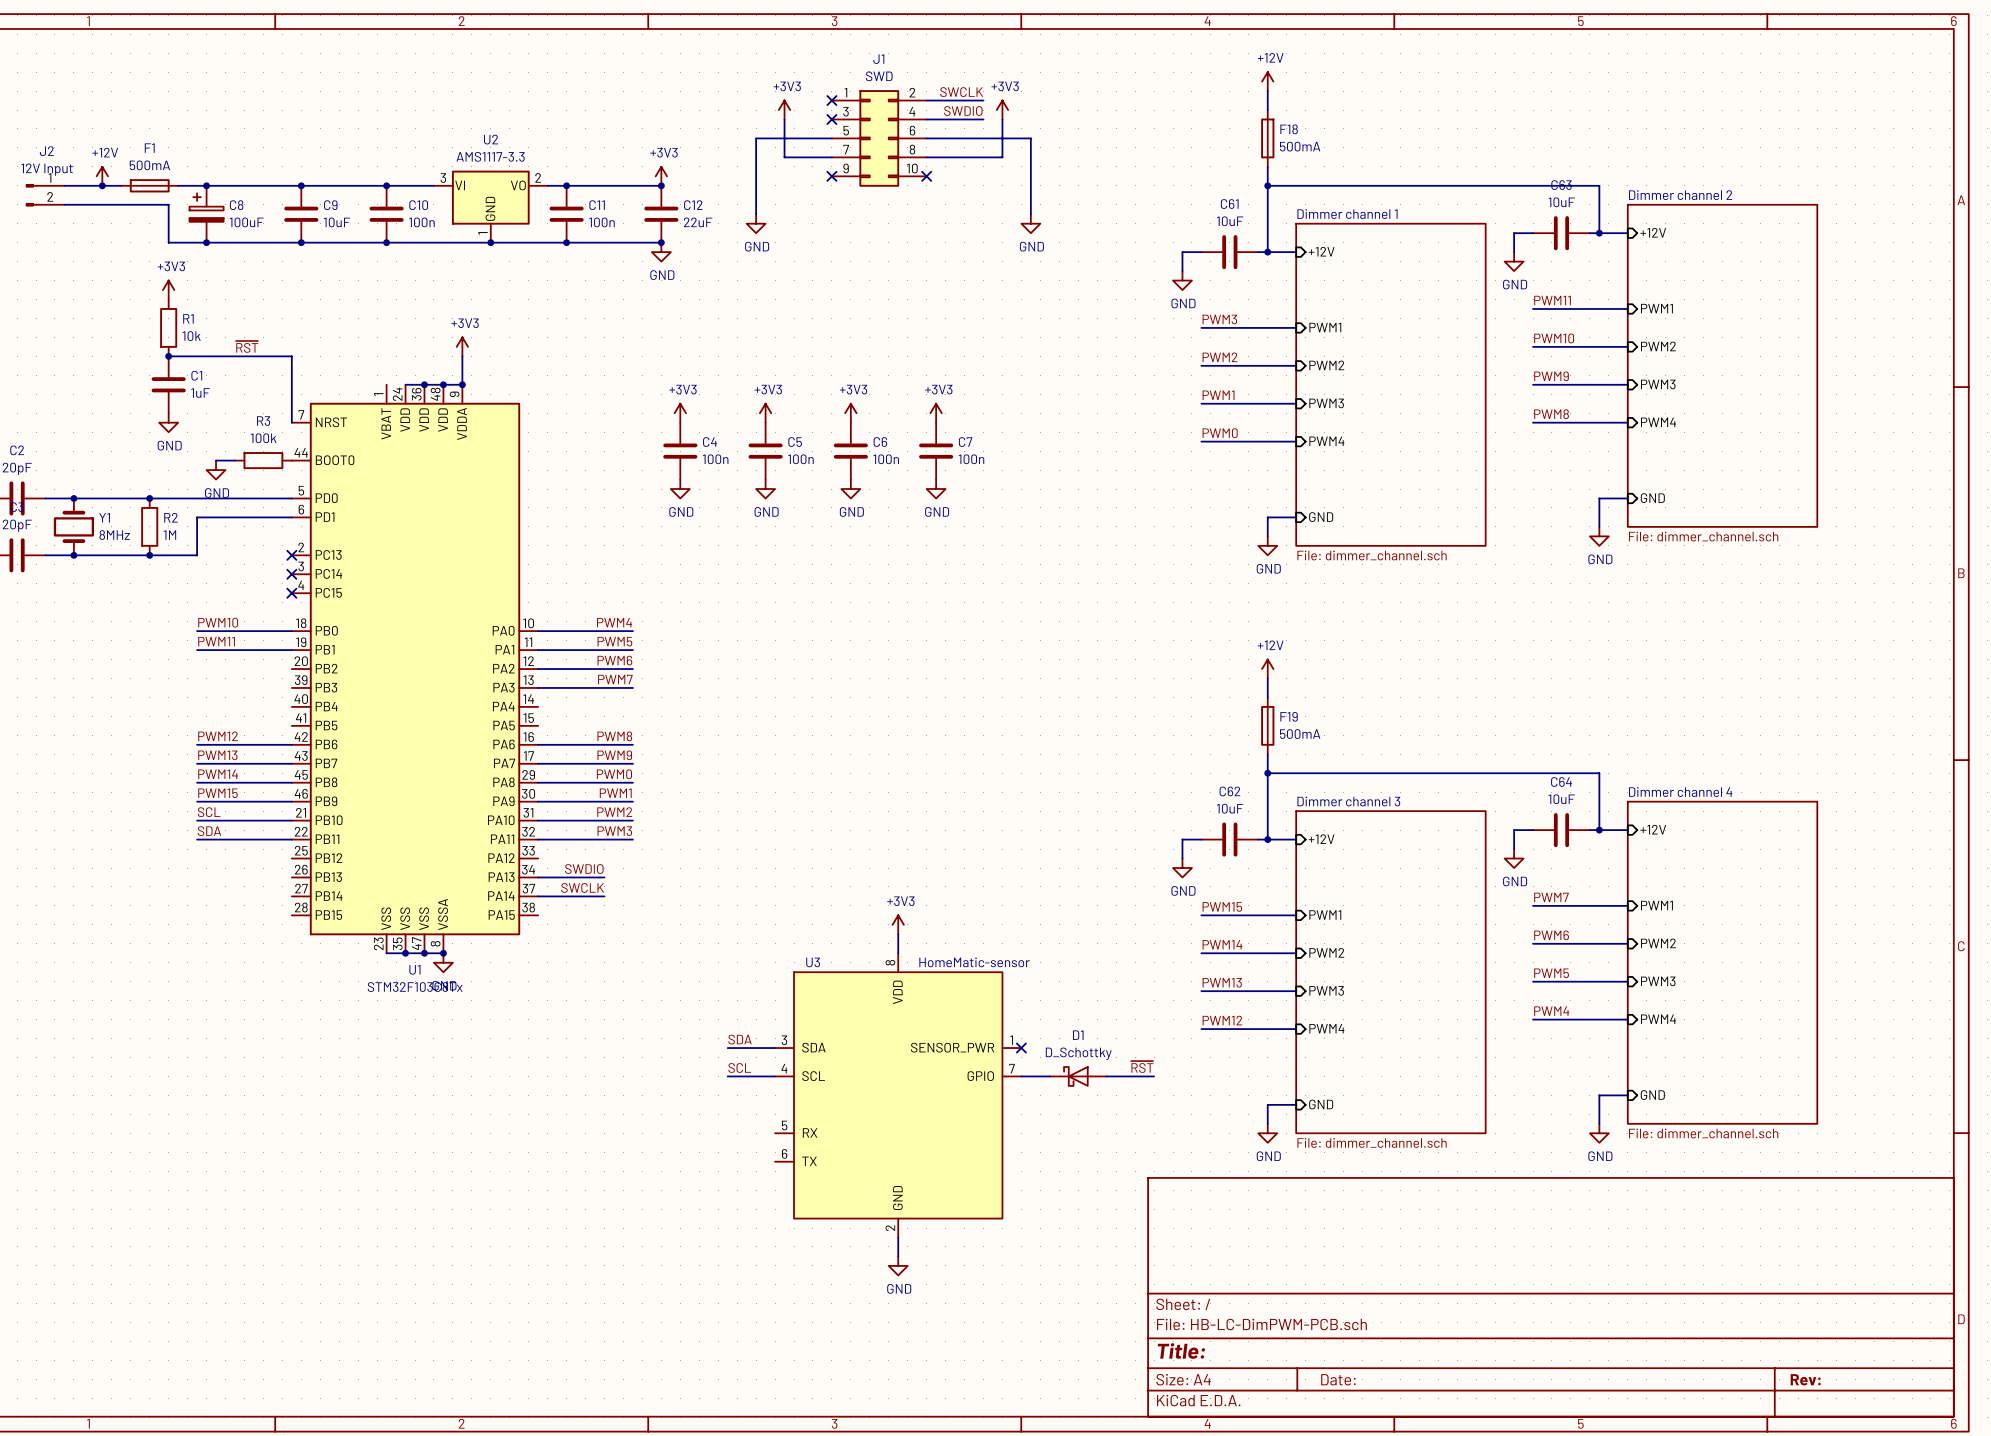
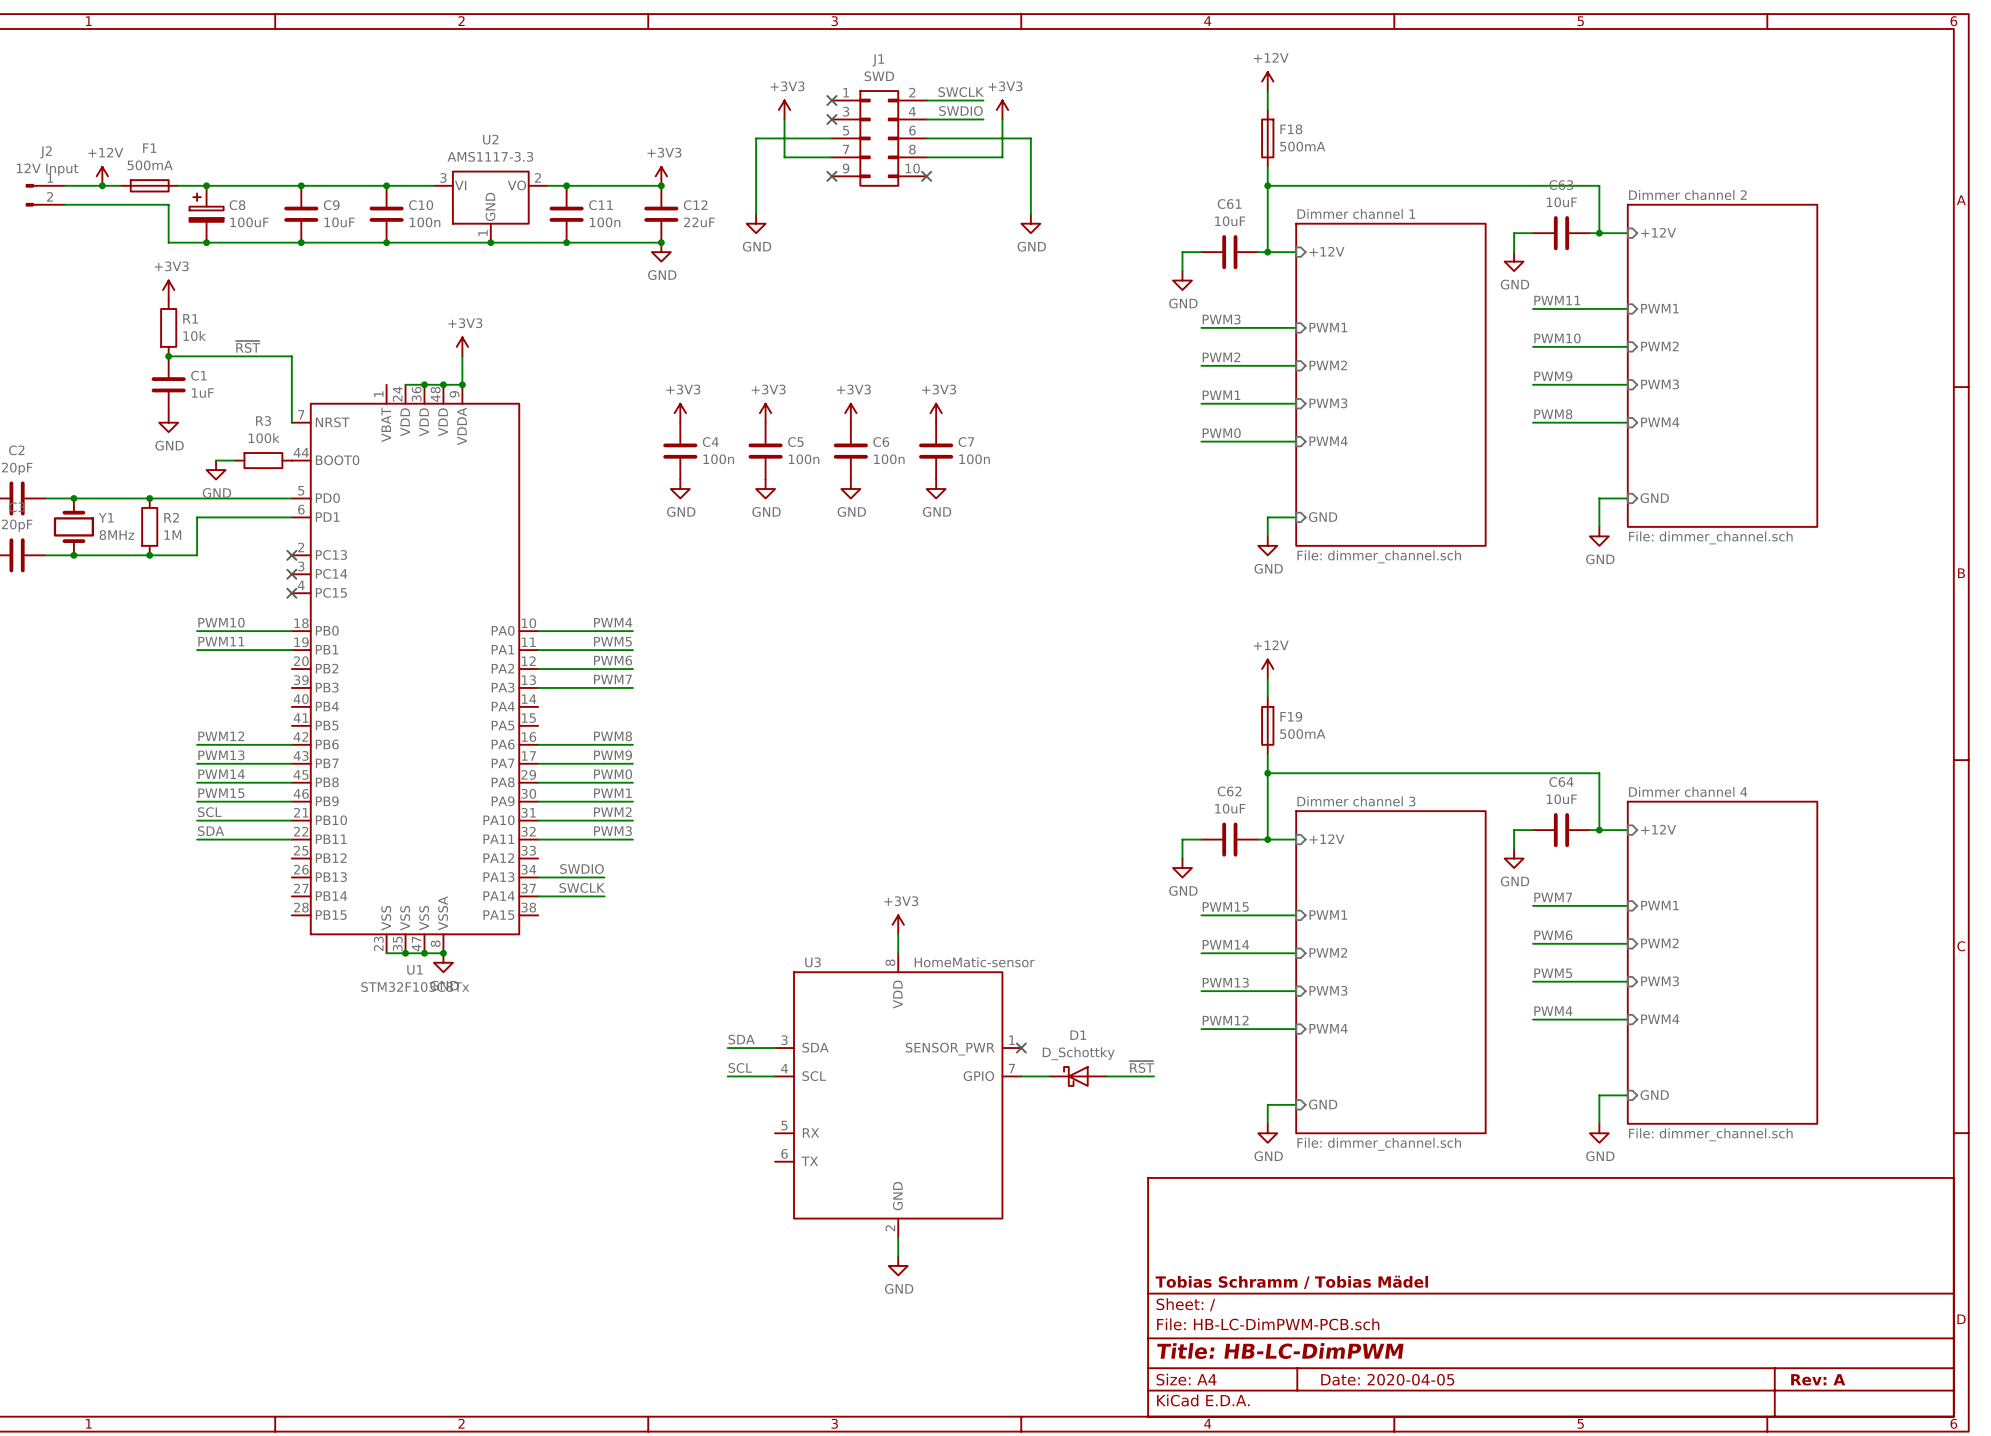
title block: none -> Tobias Schramm / Tobias Mädel (1291, 1282)
title block: Title: (1181, 1351) -> Title: HB-LC-DimPWM (1280, 1351)
title block: Date: (1338, 1379) -> Date: 2020-04-05 (1387, 1379)
title block: Rev: (1805, 1379) -> Rev: A (1818, 1379)

